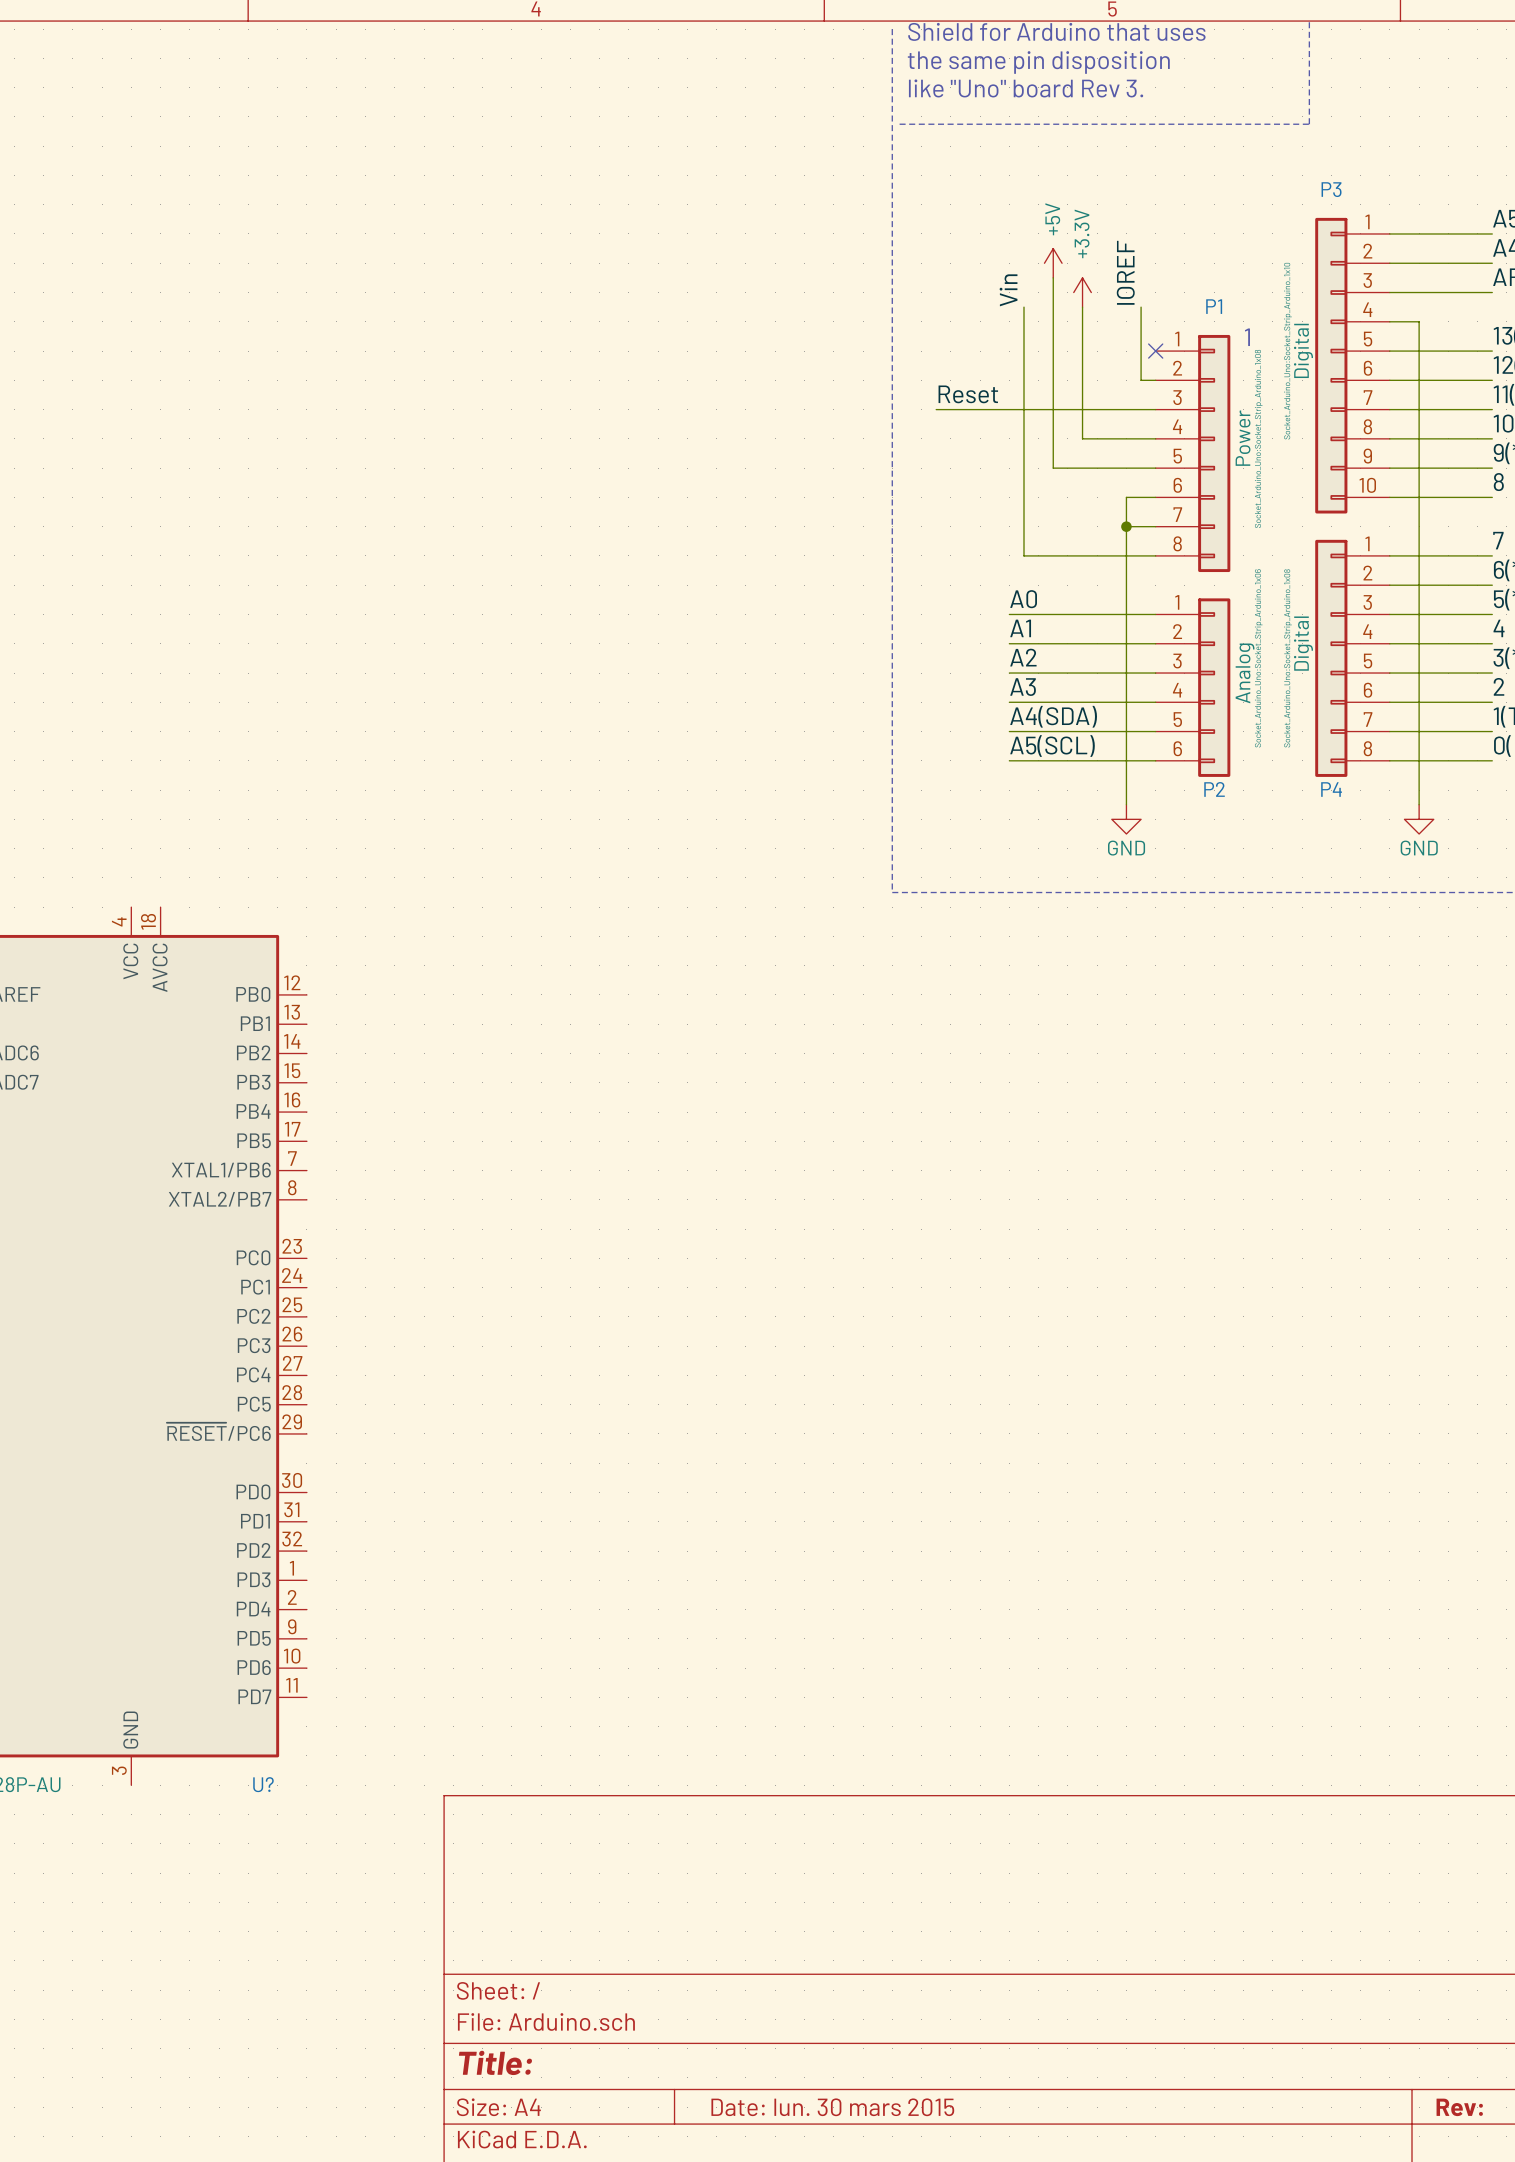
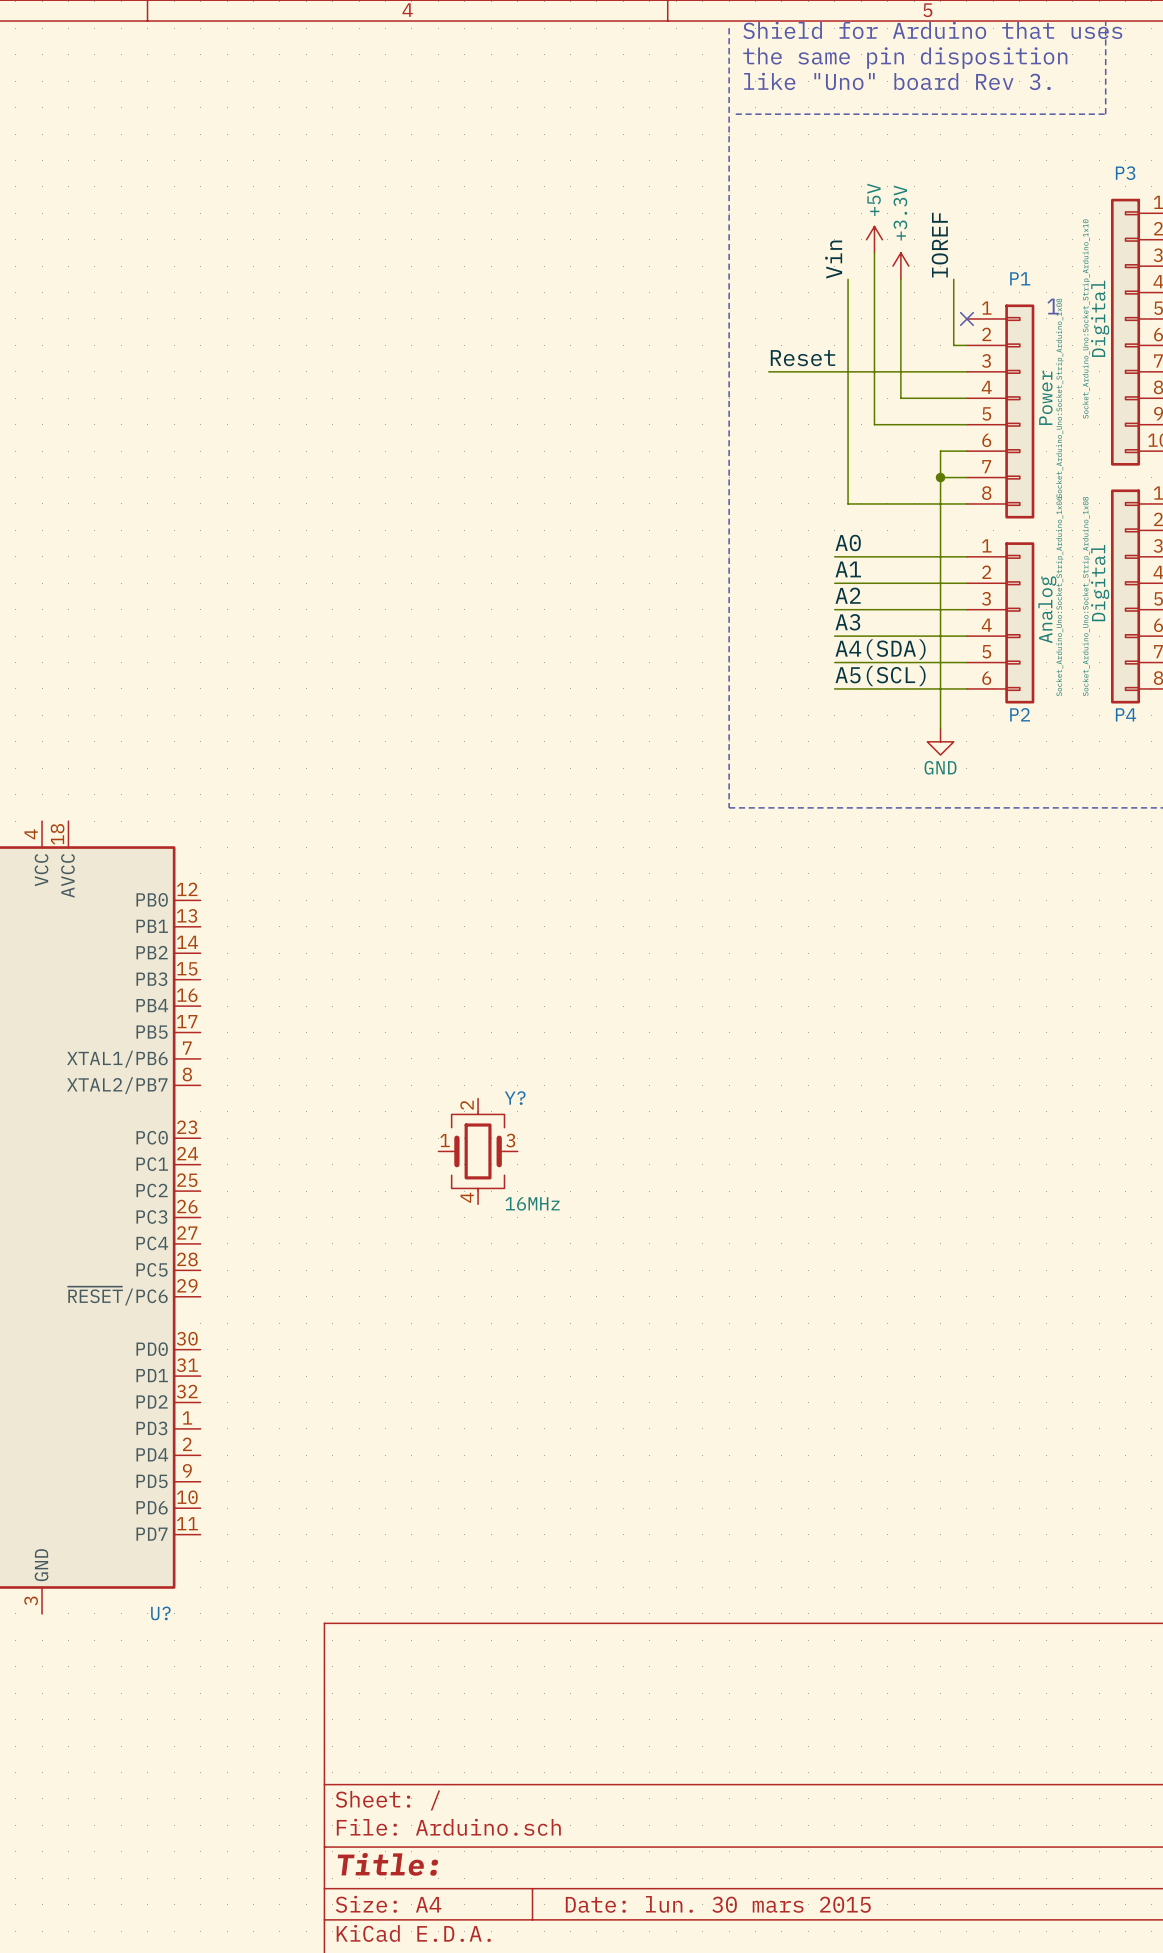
Y?: none -> 16MHz (478, 1151)

